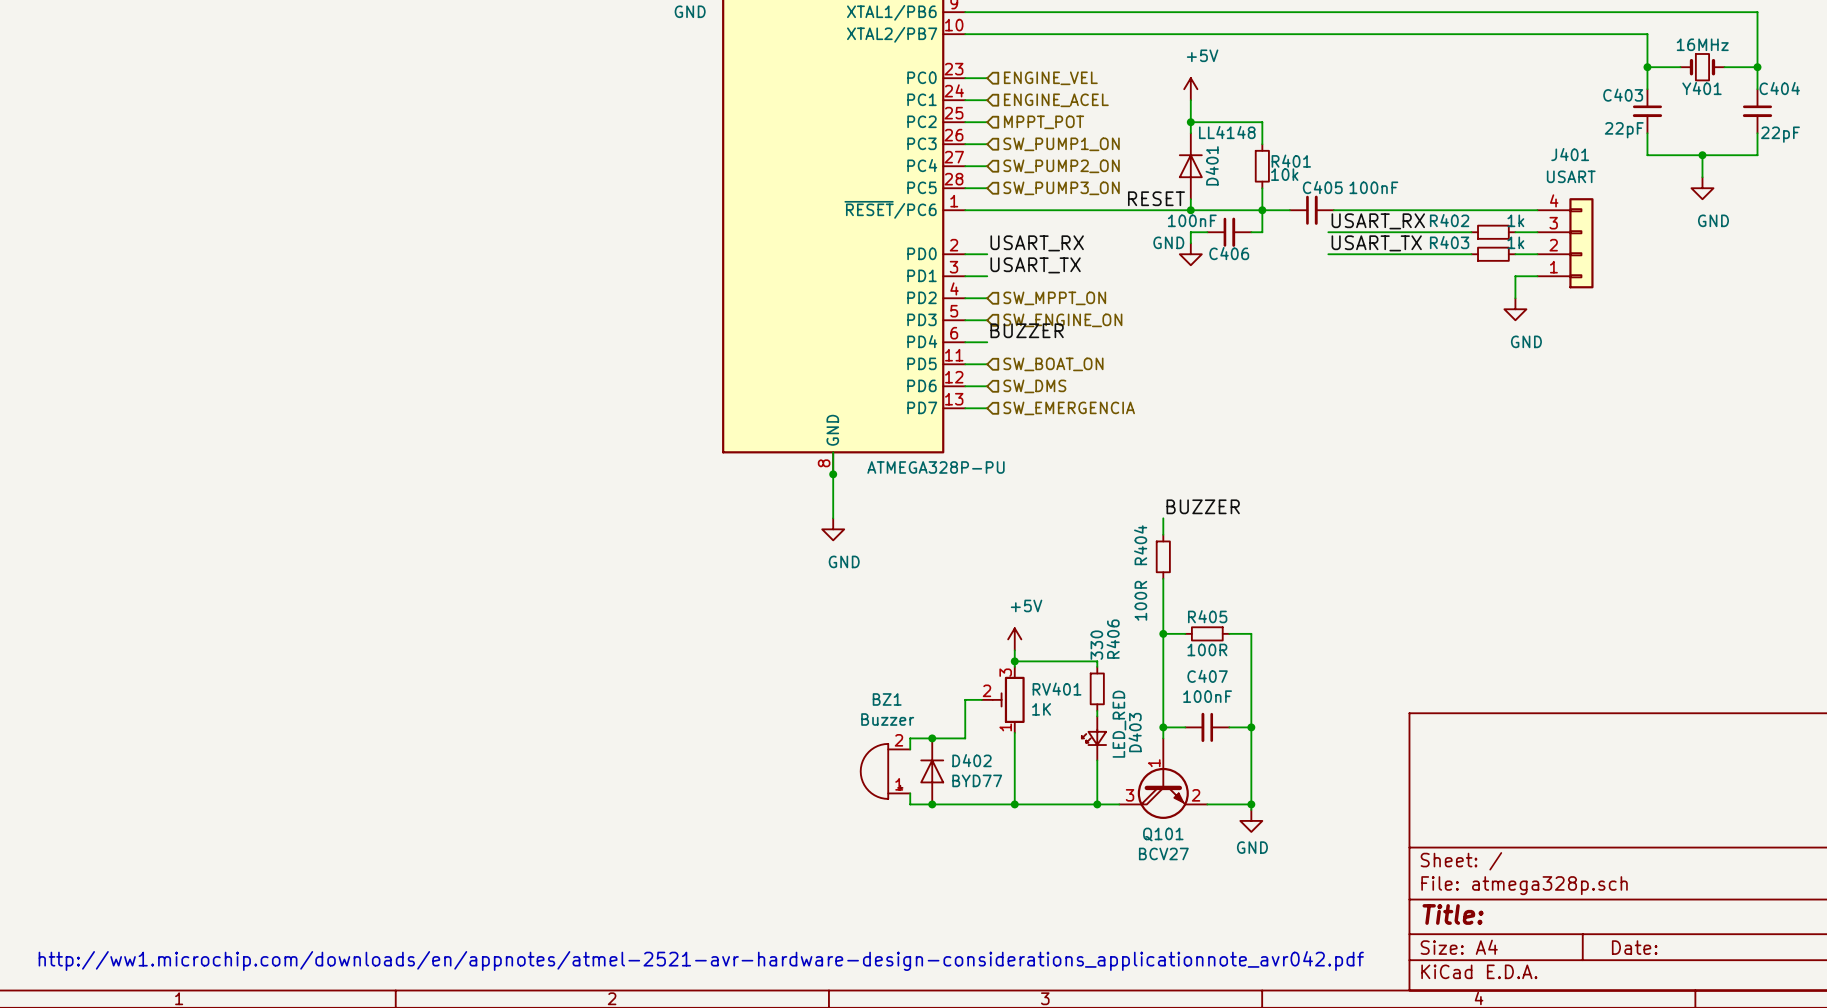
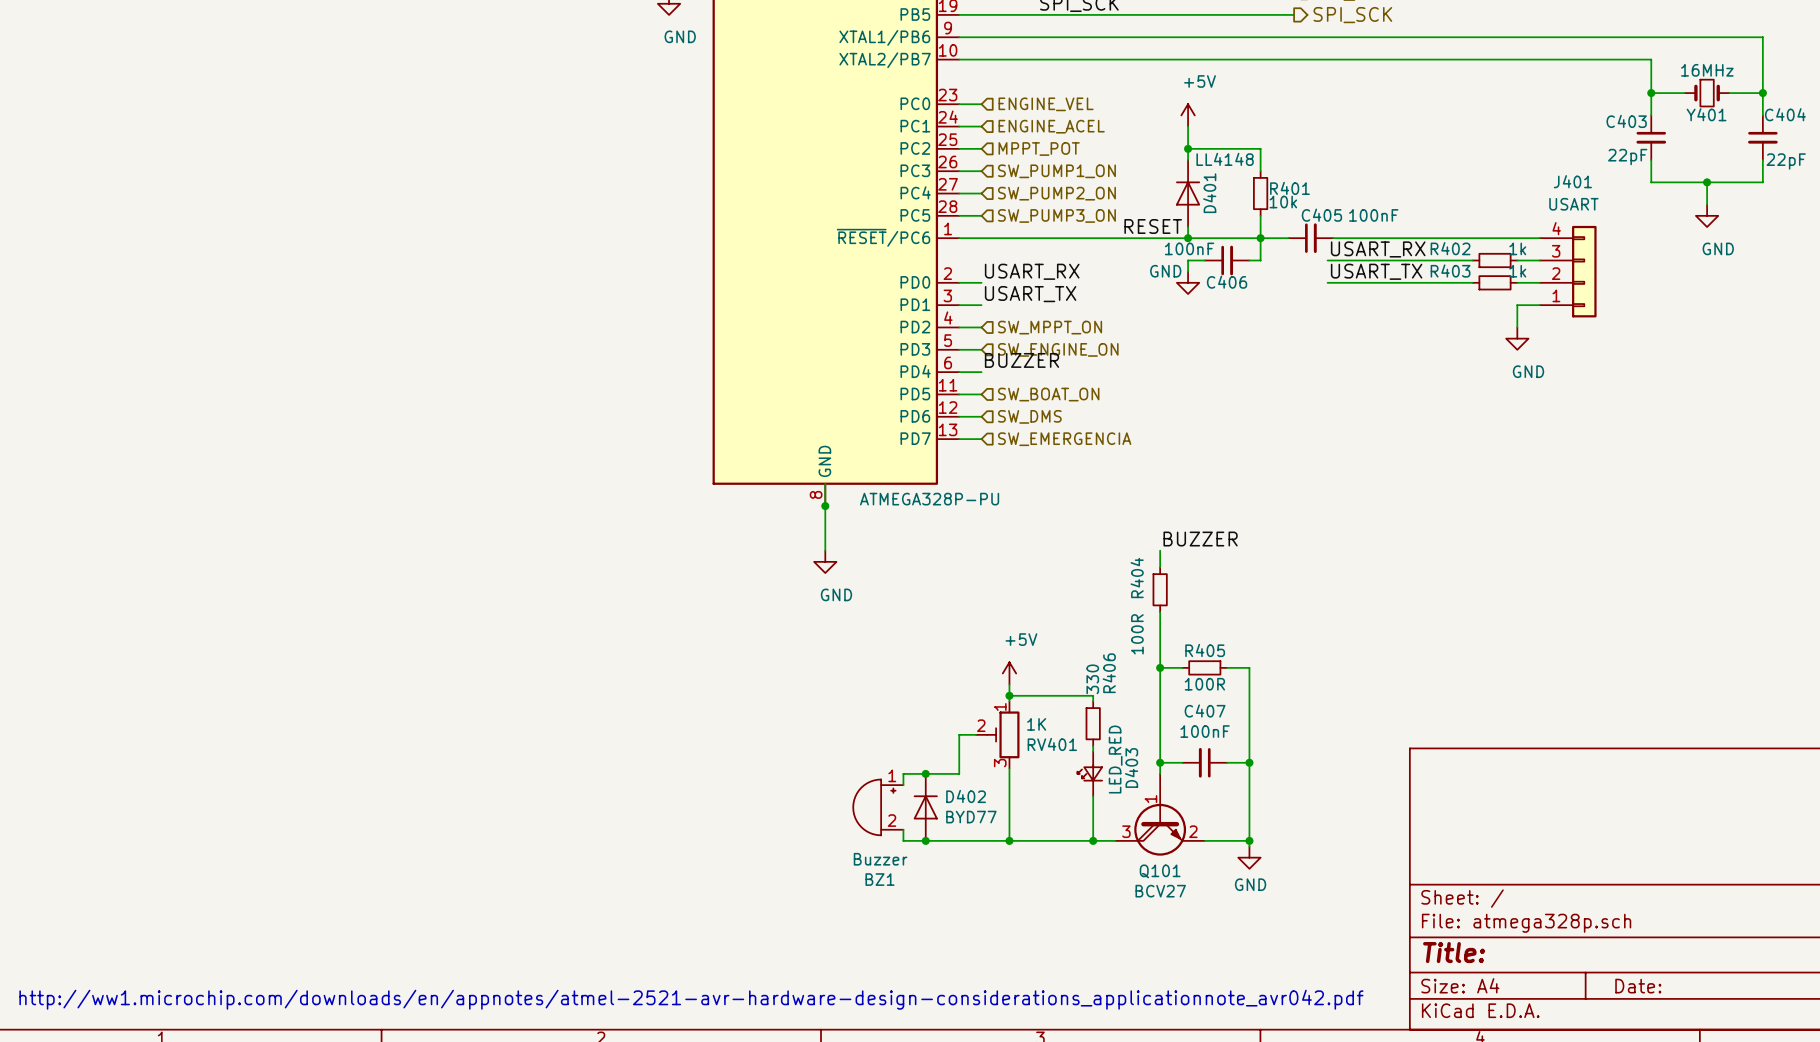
RV401 flip: as is (1008, 699) -> up-down (1003, 734)
BZ1 flip: as is (881, 771) -> up-down (874, 807)

